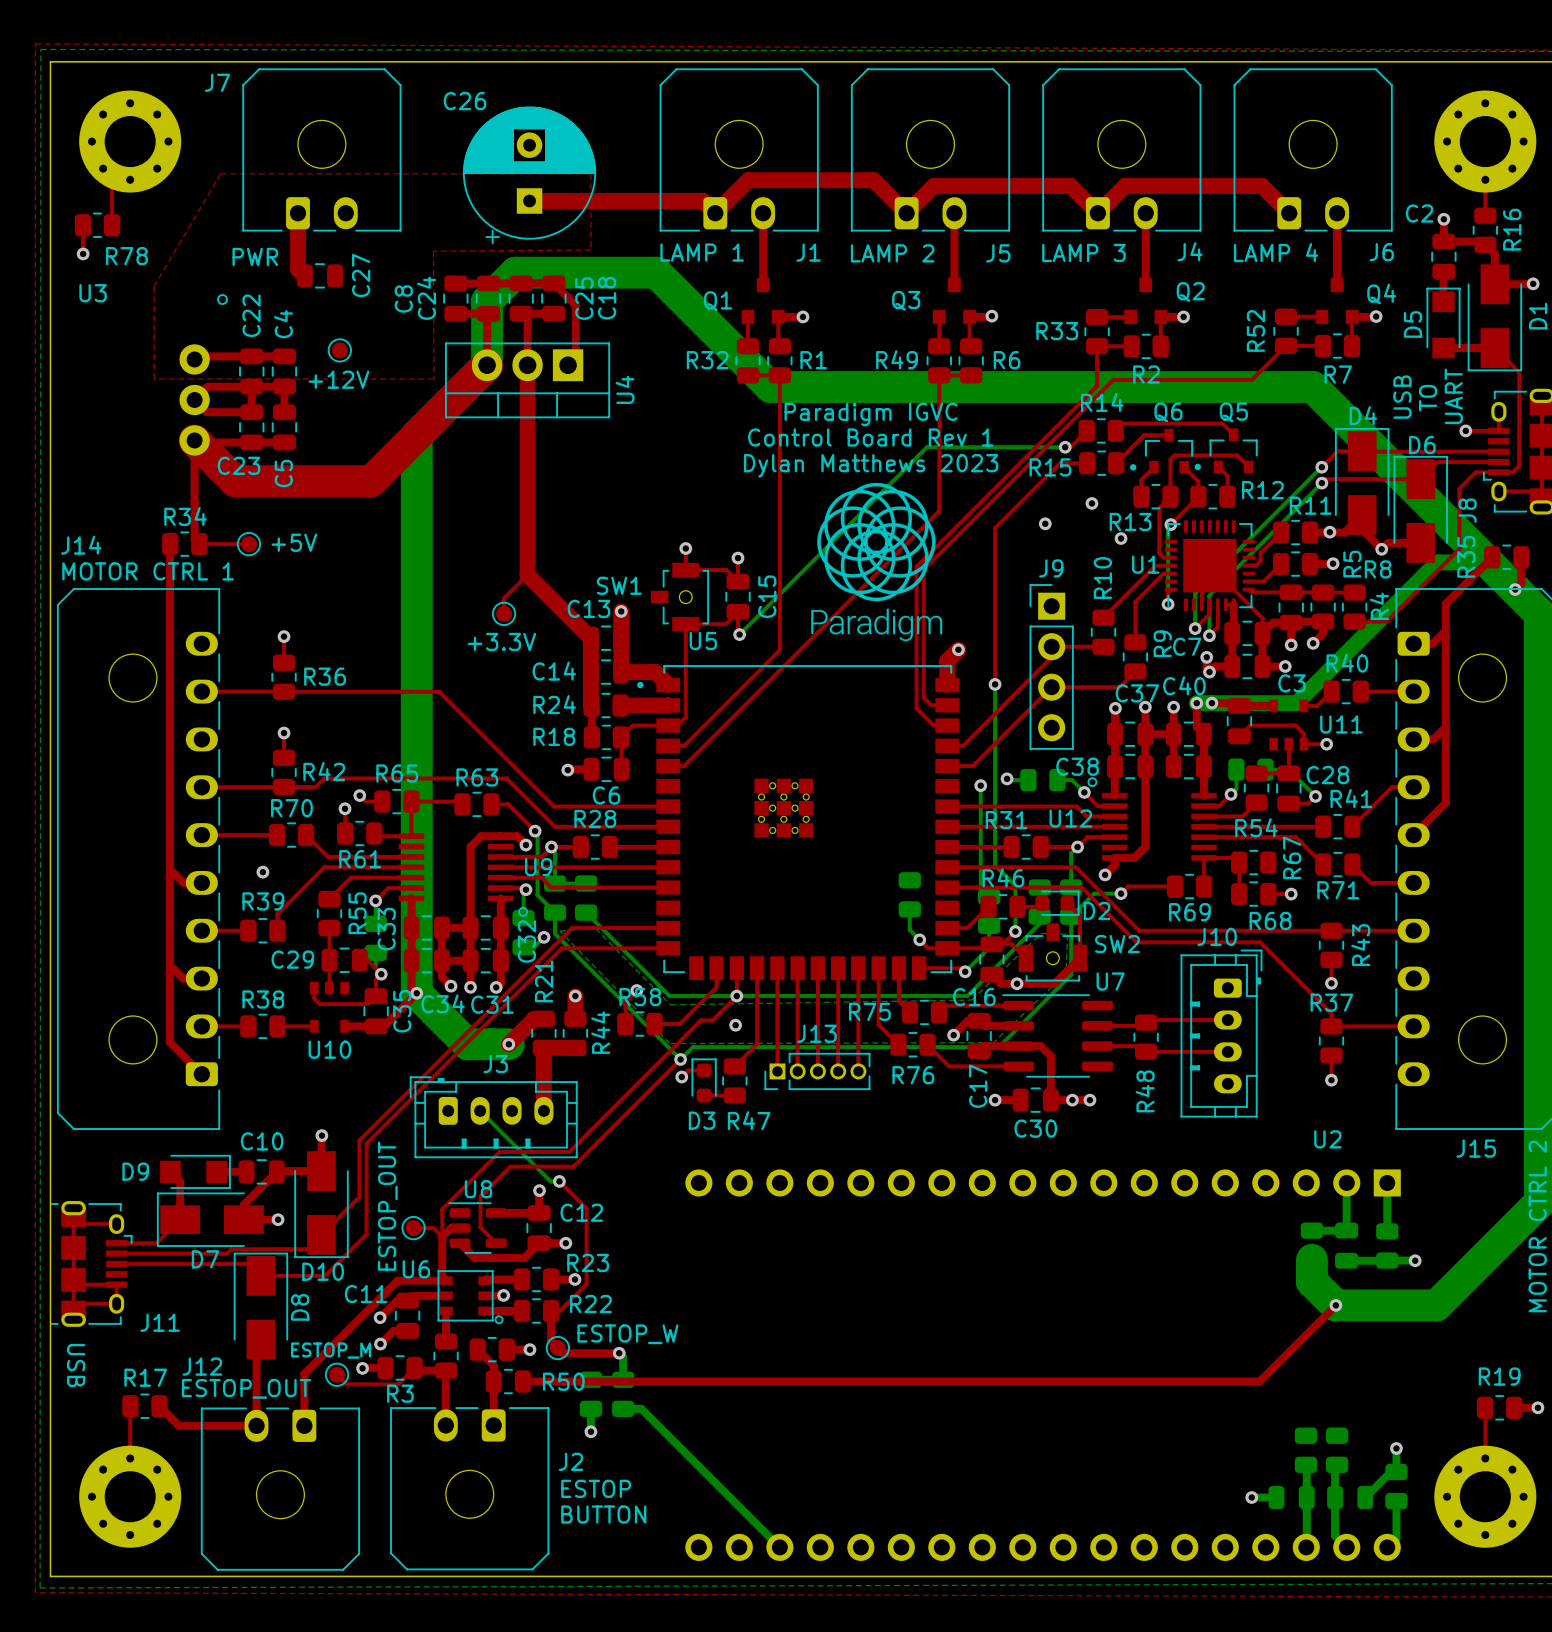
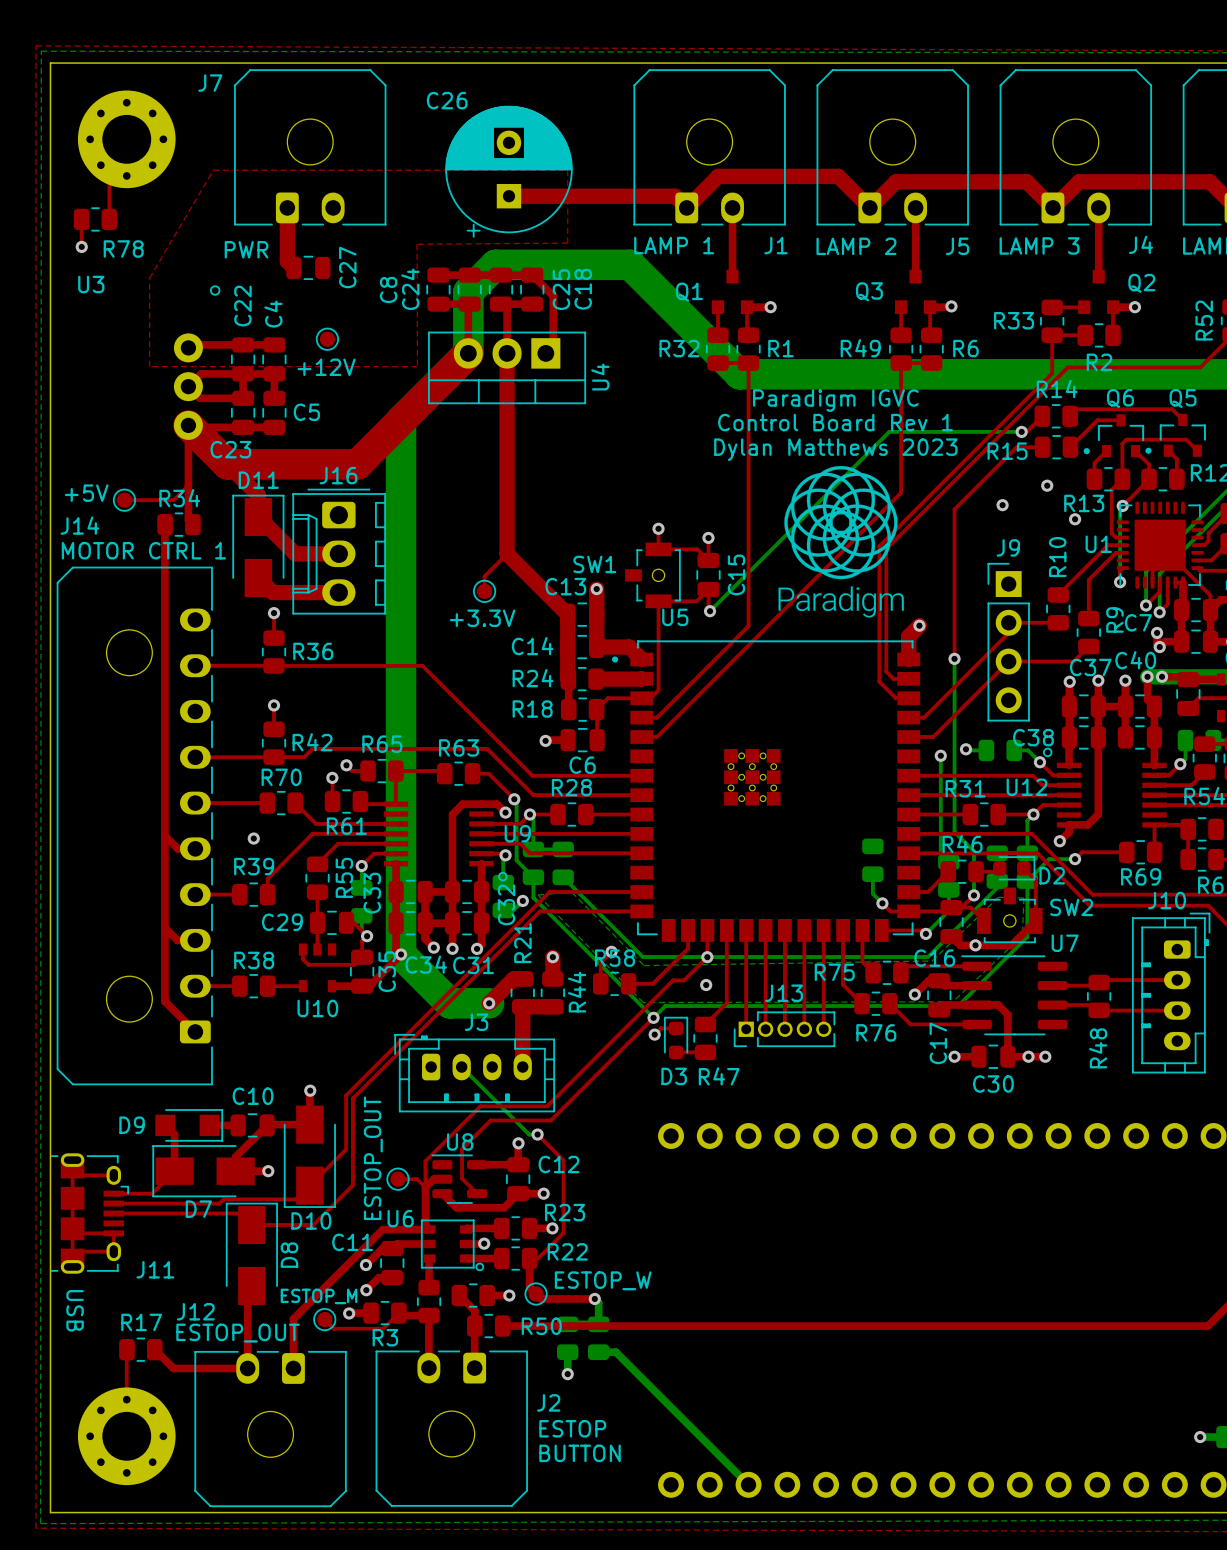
C5 name rotation: 0° (283, 473) -> 90° clockwise (306, 412)
C5 name position: C5 (283, 473) -> C5 (306, 412)
top track: none -> (227, 464) (258, 495) (258, 516) (295, 553) (338, 553)
top track: none -> (188, 485) (173, 500) (124, 500)
text position: +5V (294, 542) -> +5V (86, 493)
top track: (199, 544) (248, 544) -> none
part position: (248, 544) -> (124, 500)
D11: none -> (258, 545)
J16: none -> (339, 551)
top track: none -> (258, 578) (272, 592) (338, 592)

